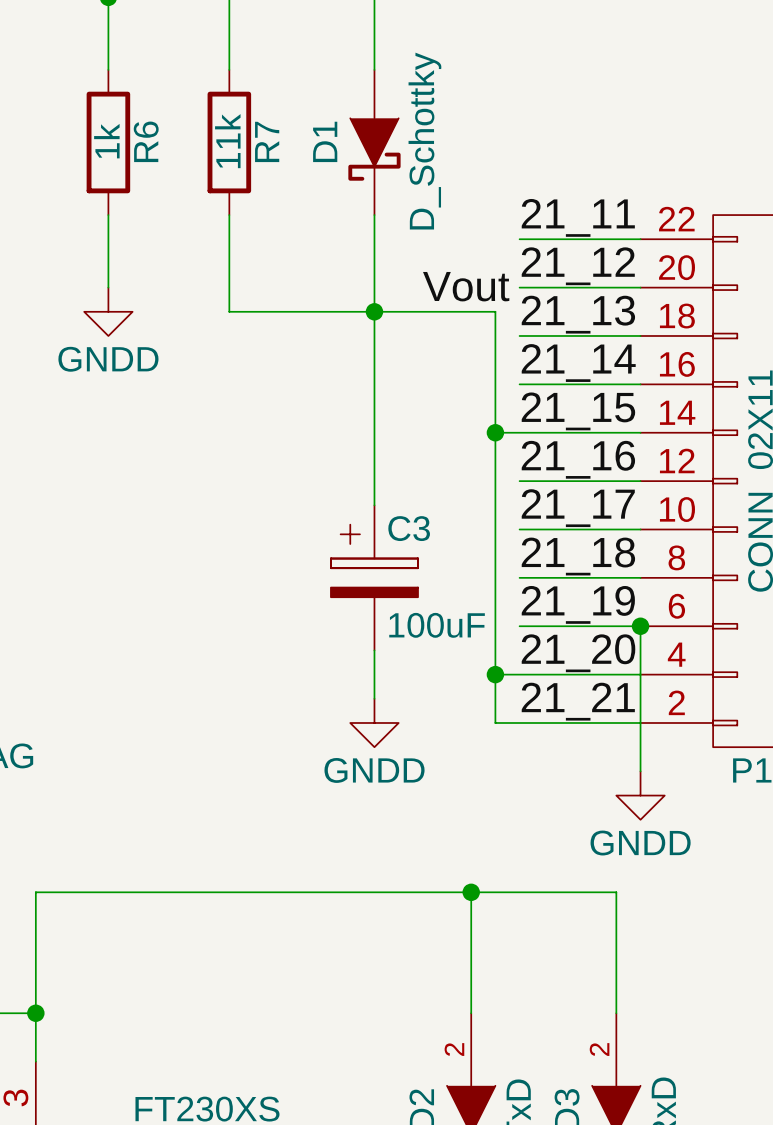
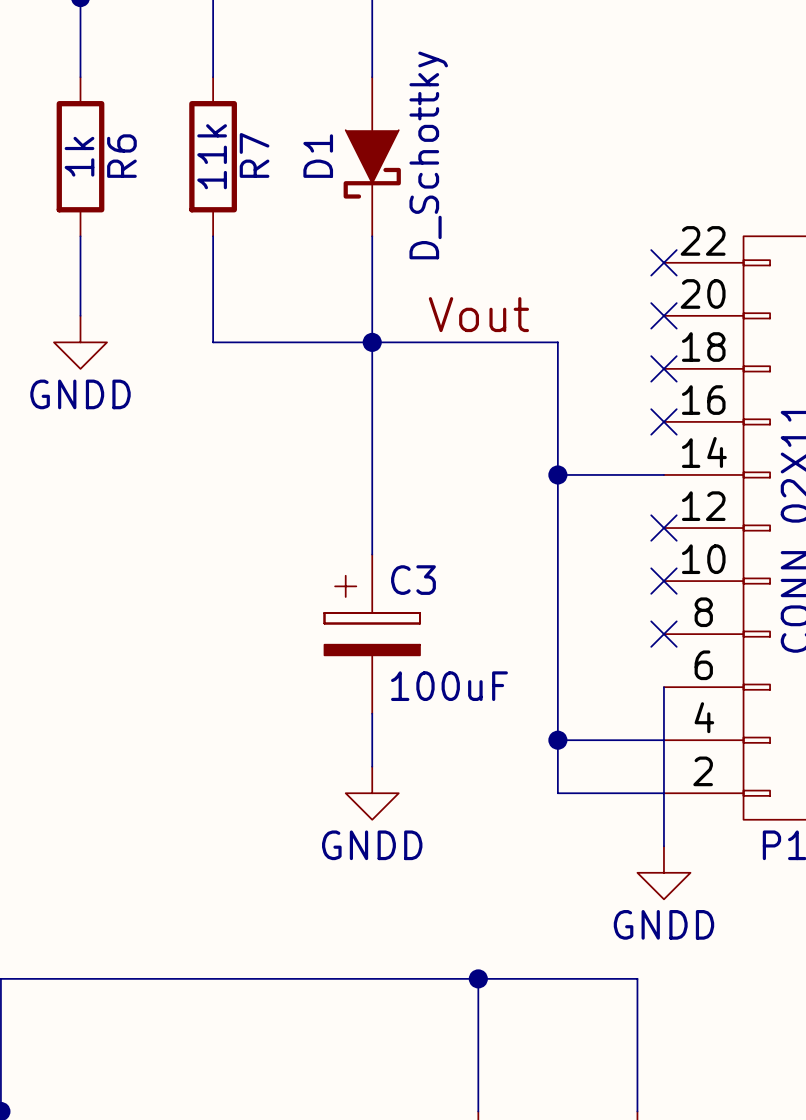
label: 21_11 (578, 217) -> none
wire: (519, 239) (640, 239) -> none
no-connect mark: none -> (663, 262)
label: 21_12 (578, 266) -> none
wire: (519, 287) (640, 287) -> none
no-connect mark: none -> (663, 315)
wire: (495, 311) (495, 722) (543, 722) -> (504, 342) (557, 342) (557, 793)
label: 21_13 (578, 314) -> none
wire: (519, 335) (640, 335) -> none
no-connect mark: none -> (663, 368)
label: 21_14 (578, 363) -> none
wire: (519, 384) (640, 384) -> none
no-connect mark: none -> (663, 421)
label: 21_15 (578, 411) -> none
wire: (495, 432) (543, 432) -> none
junction position: (495, 432) -> (557, 474)
label: 21_16 (578, 459) -> none
wire: (519, 481) (640, 481) -> none
no-connect mark: none -> (663, 528)
label: 21_17 (578, 508) -> none
wire: (519, 529) (640, 529) -> none
no-connect mark: none -> (663, 581)
label: 21_18 (578, 556) -> none
wire: (519, 577) (640, 577) -> none
no-connect mark: none -> (663, 634)
label: 21_19 (578, 604) -> none
wire: (519, 626) (640, 626) -> none
junction: (640, 626) -> none
label: 21_20 (578, 653) -> none
wire: (495, 674) (543, 674) -> none
junction position: (495, 674) -> (557, 740)
label: 21_21 (578, 701) -> none

